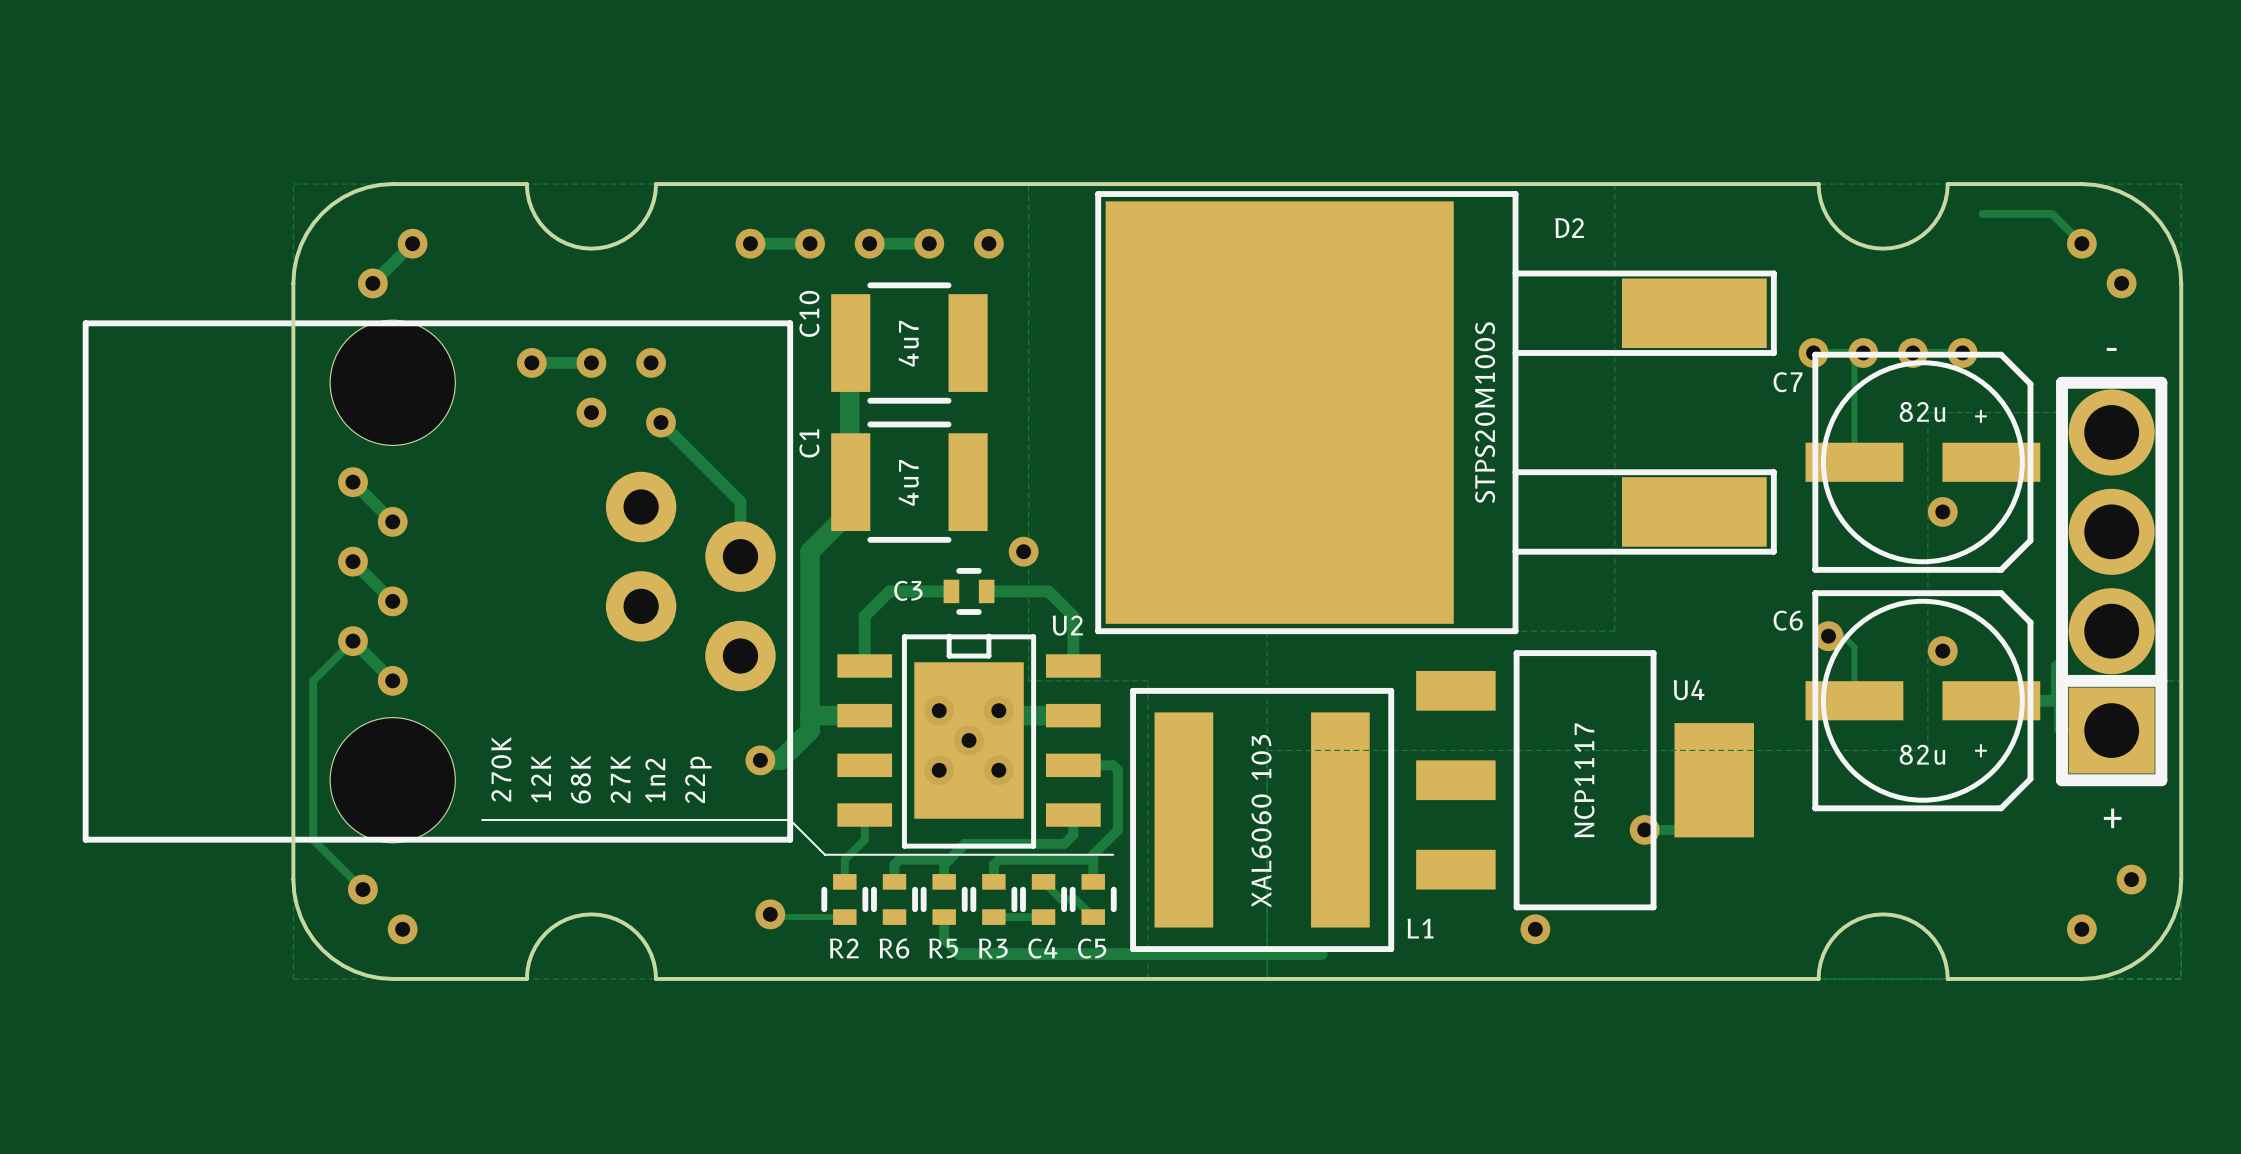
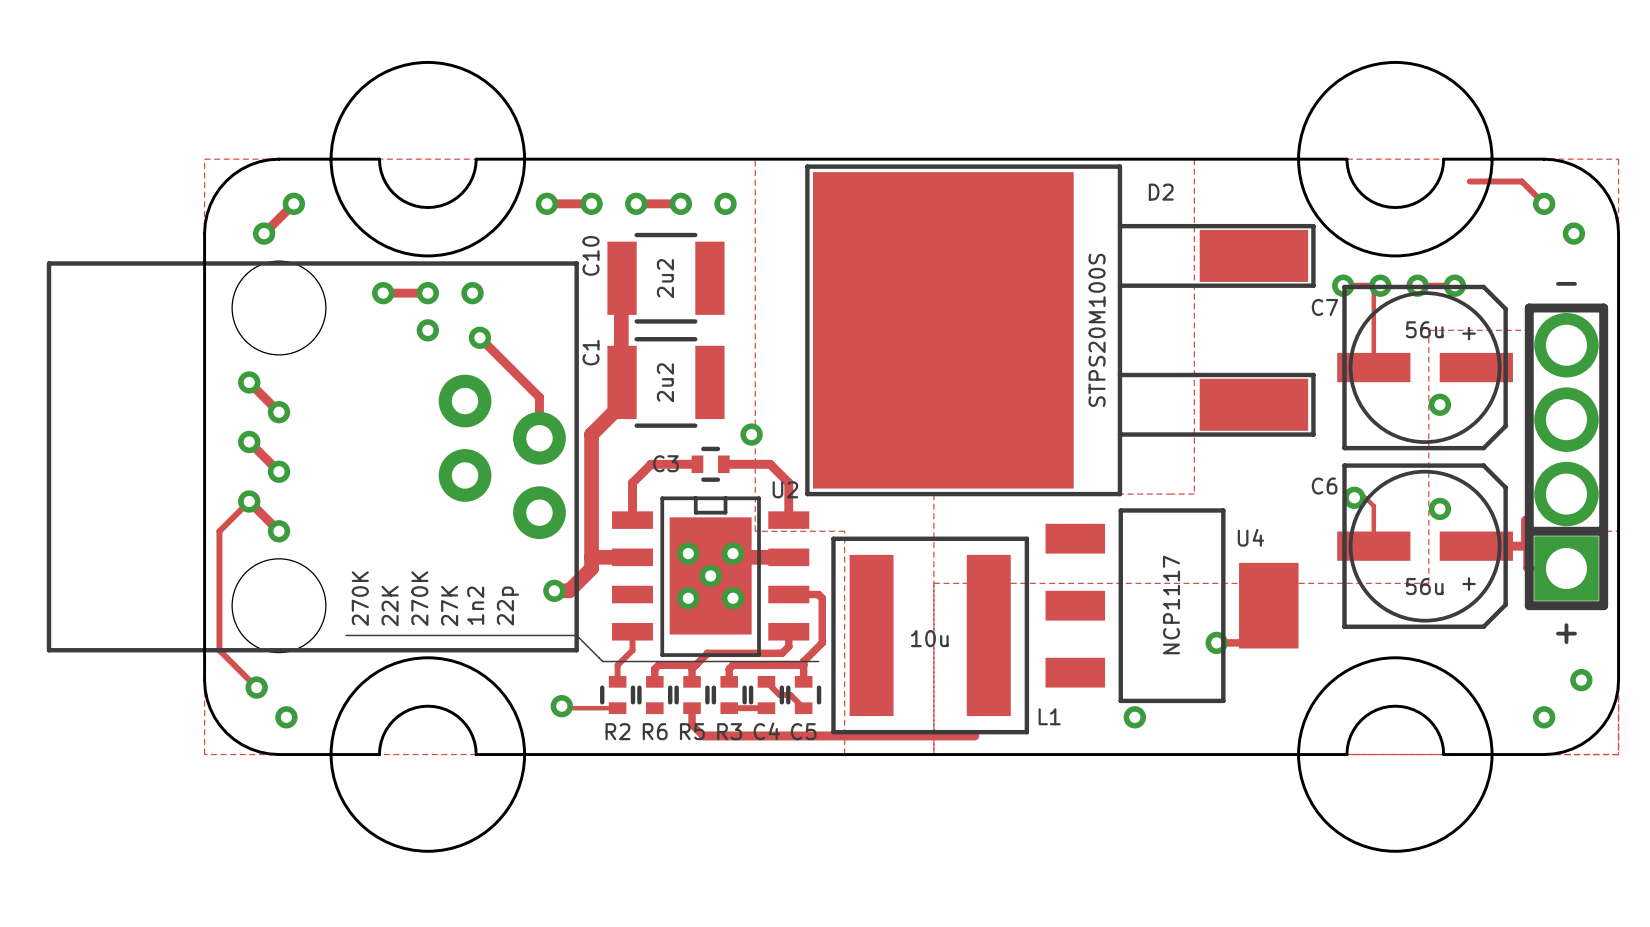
round board edge: none -> [329, 60, 527, 258]
round board edge: none -> [1297, 60, 1494, 258]
C10 value: 4u7 (908, 343) -> 2u2 (665, 278)
C7 value: 82u (1922, 411) -> 56u (1424, 329)
C1 value: 4u7 (908, 482) -> 2u2 (665, 382)
C6 value: 82u (1922, 754) -> 56u (1424, 586)
R6 value: 12K (541, 779) -> 22K (390, 606)
R5 value: 68K (580, 779) -> 270K (419, 598)
L1 value: XAL6060 103 (1261, 821) -> 10u (929, 638)
round board edge: none -> [329, 656, 527, 853]
round board edge: none -> [1297, 656, 1494, 853]

